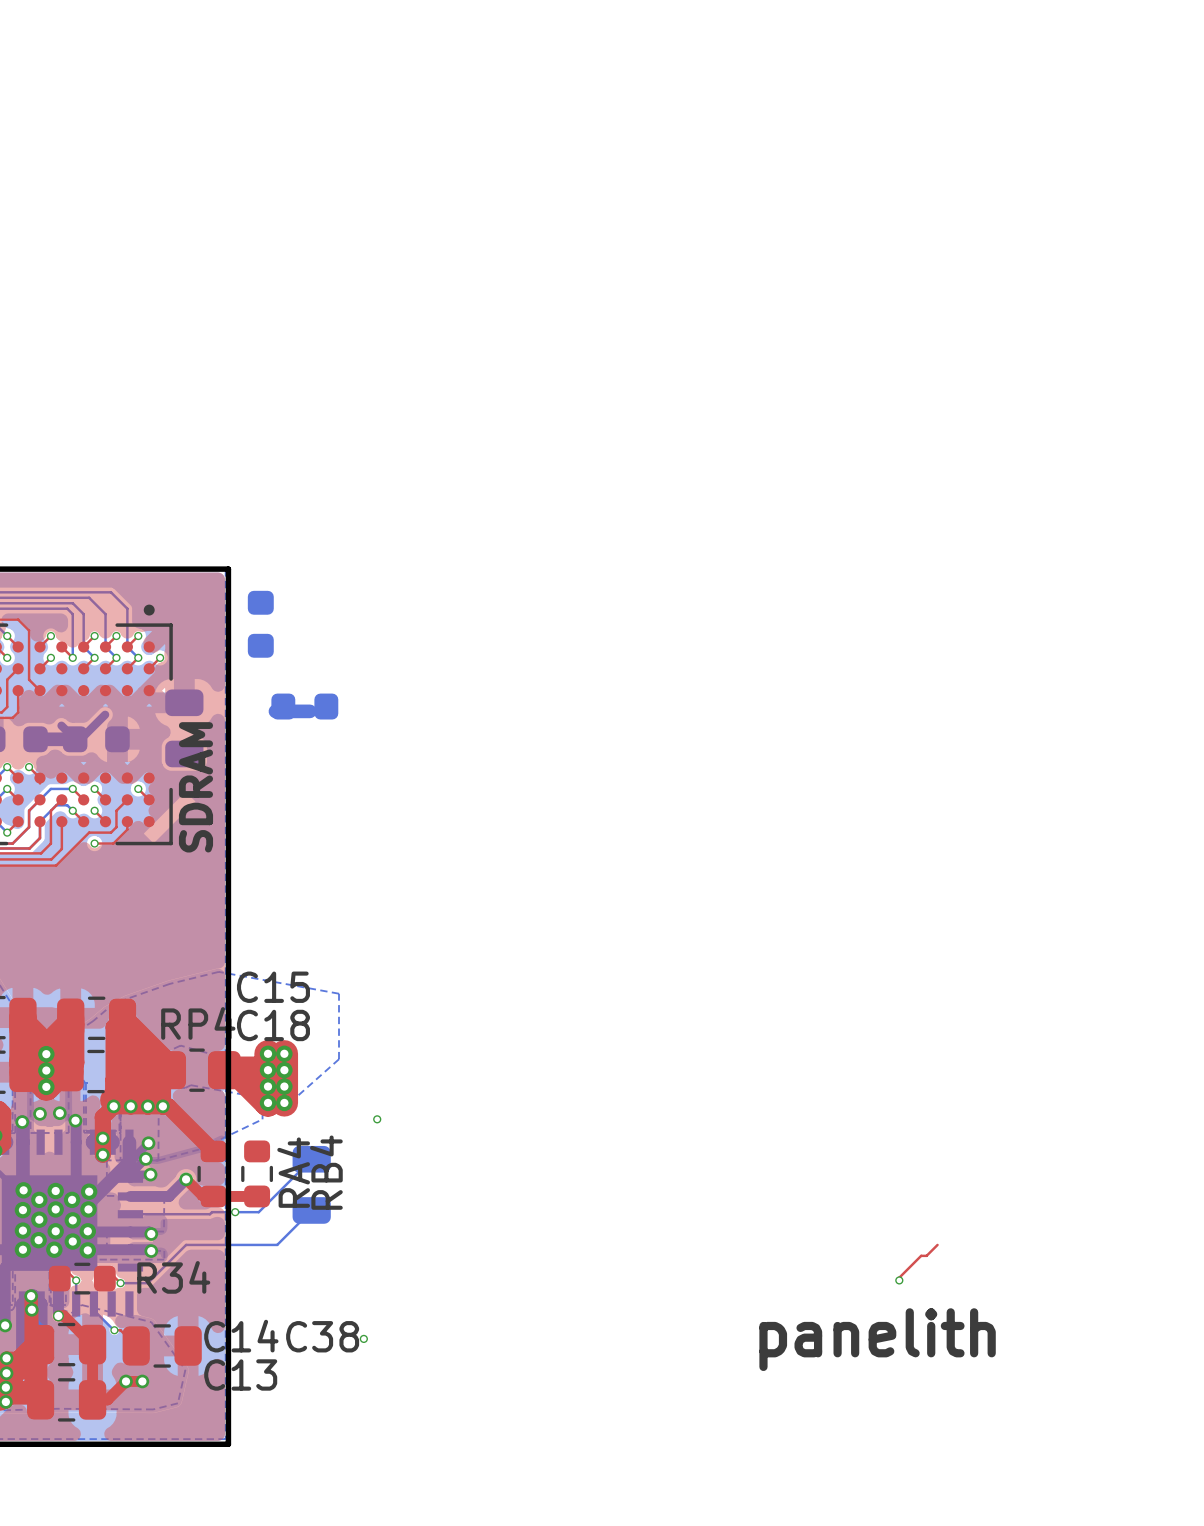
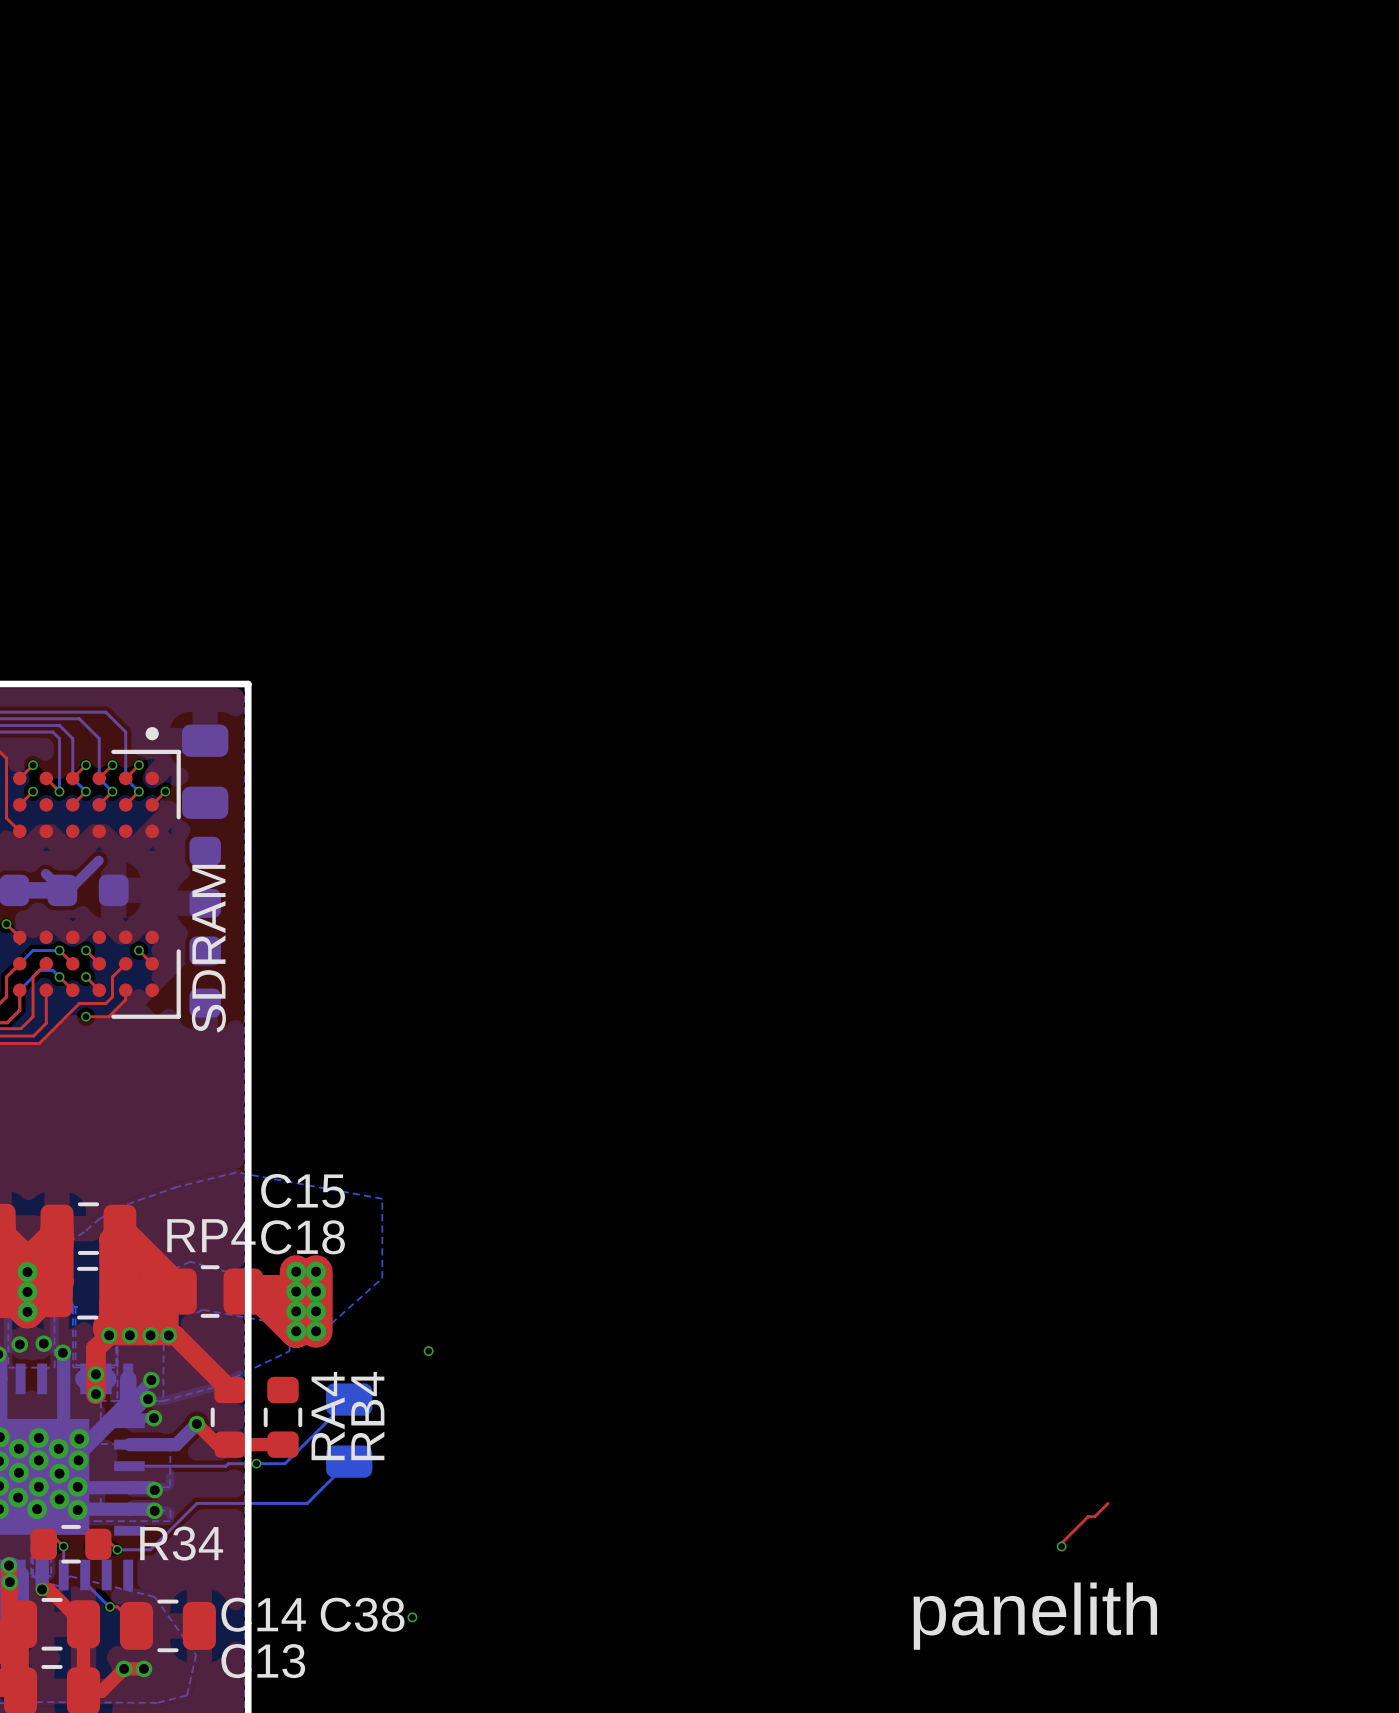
part: (260, 624) -> none
part: none -> (205, 771)
part footprint: [165, 689, 204, 768] -> [189, 836, 221, 918]
part: (304, 706) -> none
bottom track: (275, 711) (309, 711) -> none
part: none -> (205, 977)

